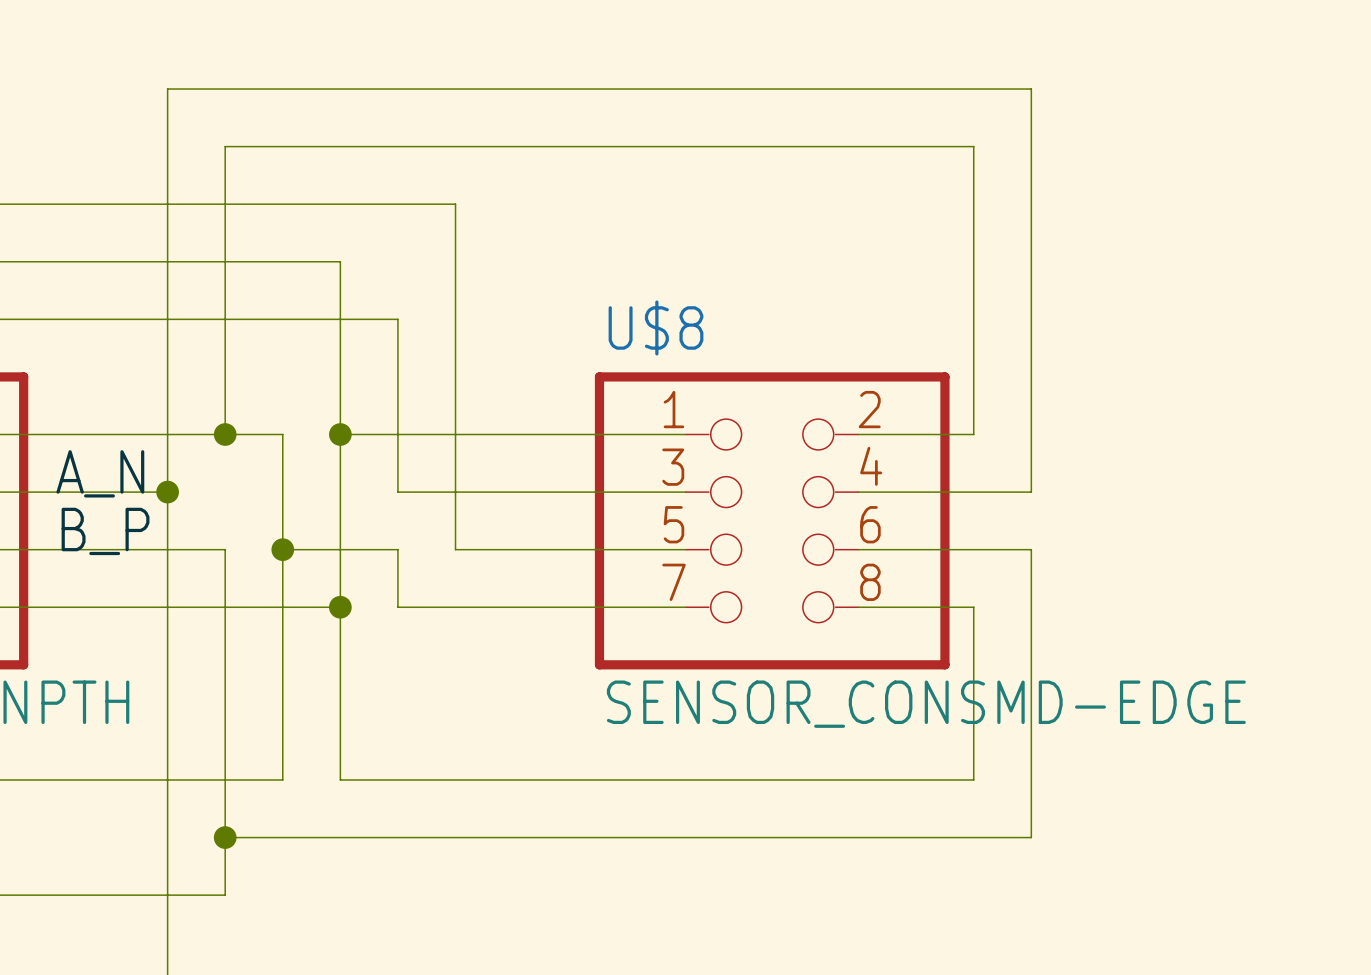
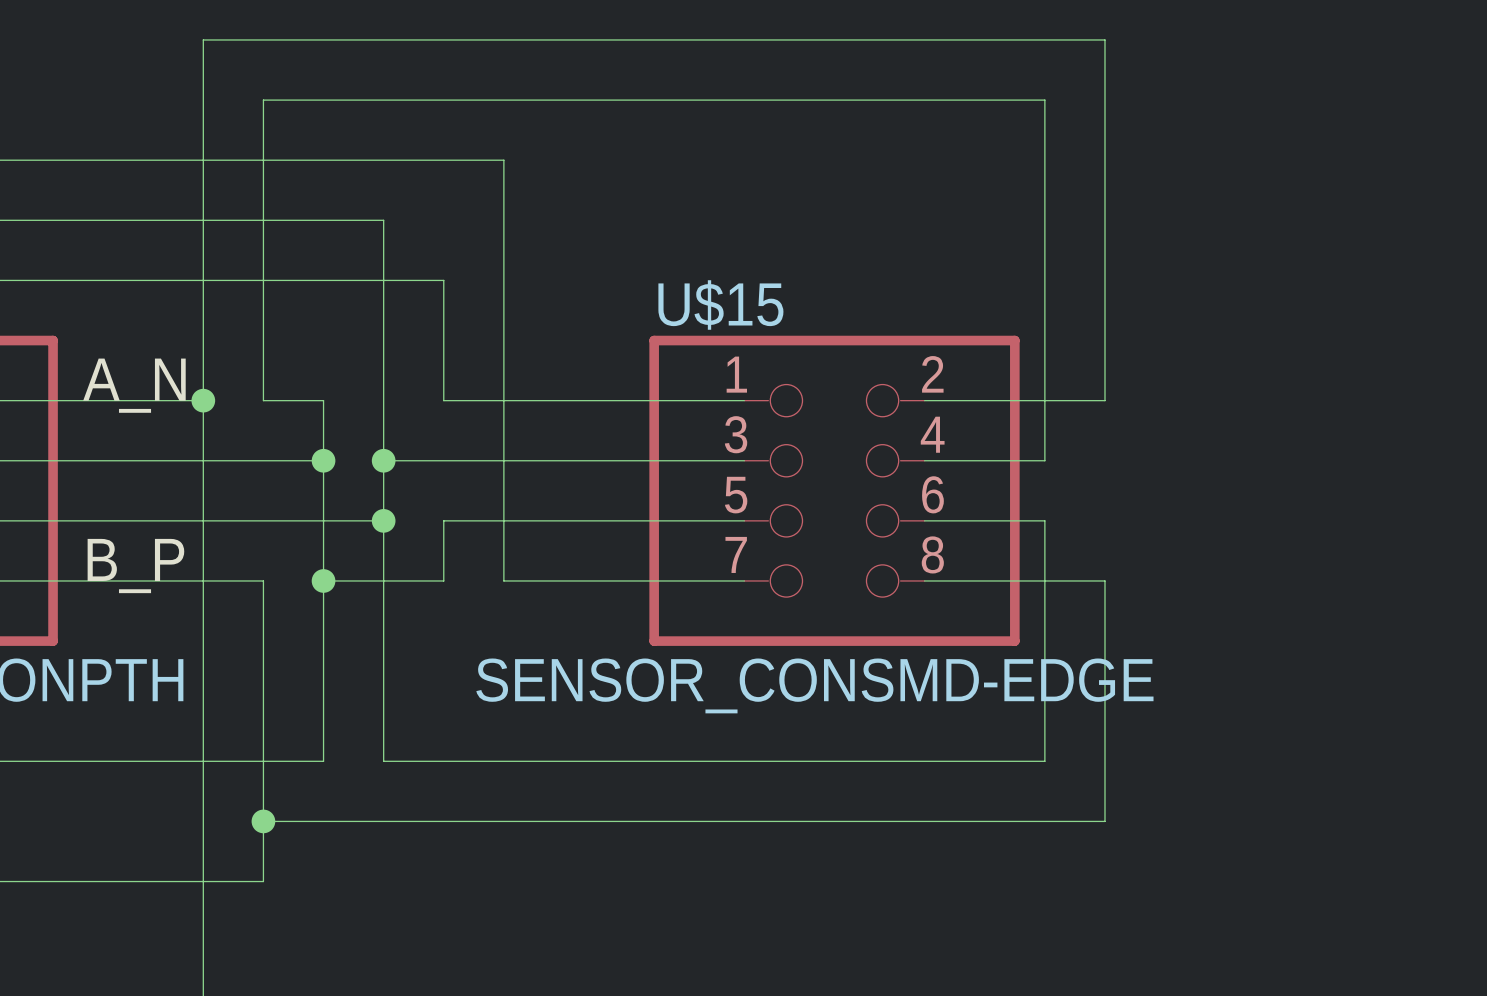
U$8 name: U$8 (656, 327) -> U$15 (720, 304)
wire: (167, 434) (225, 434) -> none
junction: none -> (203, 400)
junction: (225, 434) -> none
wire: (340, 434) (397, 434) (397, 492) -> (383, 460) (443, 460)
junction: (340, 434) -> none
wire: (1031, 434) (1031, 492) (973, 492) -> (1104, 400) (1044, 400) (1044, 460)
label position: A_N (100, 473) -> A_N (134, 385)
wire: none -> (203, 460) (323, 460)
junction: (167, 492) -> none
junction: none -> (323, 460)
junction: none -> (383, 460)
label position: B_P (105, 531) -> B_P (135, 566)
wire: (225, 549) (225, 607) (282, 607) -> (263, 520) (323, 520)
junction: (282, 549) -> none
wire: (340, 549) (397, 549) -> (383, 580) (443, 580)
junction: none -> (383, 520)
wire: (973, 549) (1031, 549) (1031, 607) -> (1044, 520) (1044, 580) (1104, 580)
junction: none -> (323, 580)
junction: (340, 607) -> none
wire: (397, 607) (455, 607) -> (443, 520) (503, 520) (503, 580)
U$8 value position: SENSOR_CONSMD-EDGE (926, 704) -> SENSOR_CONSMD-EDGE (814, 685)

